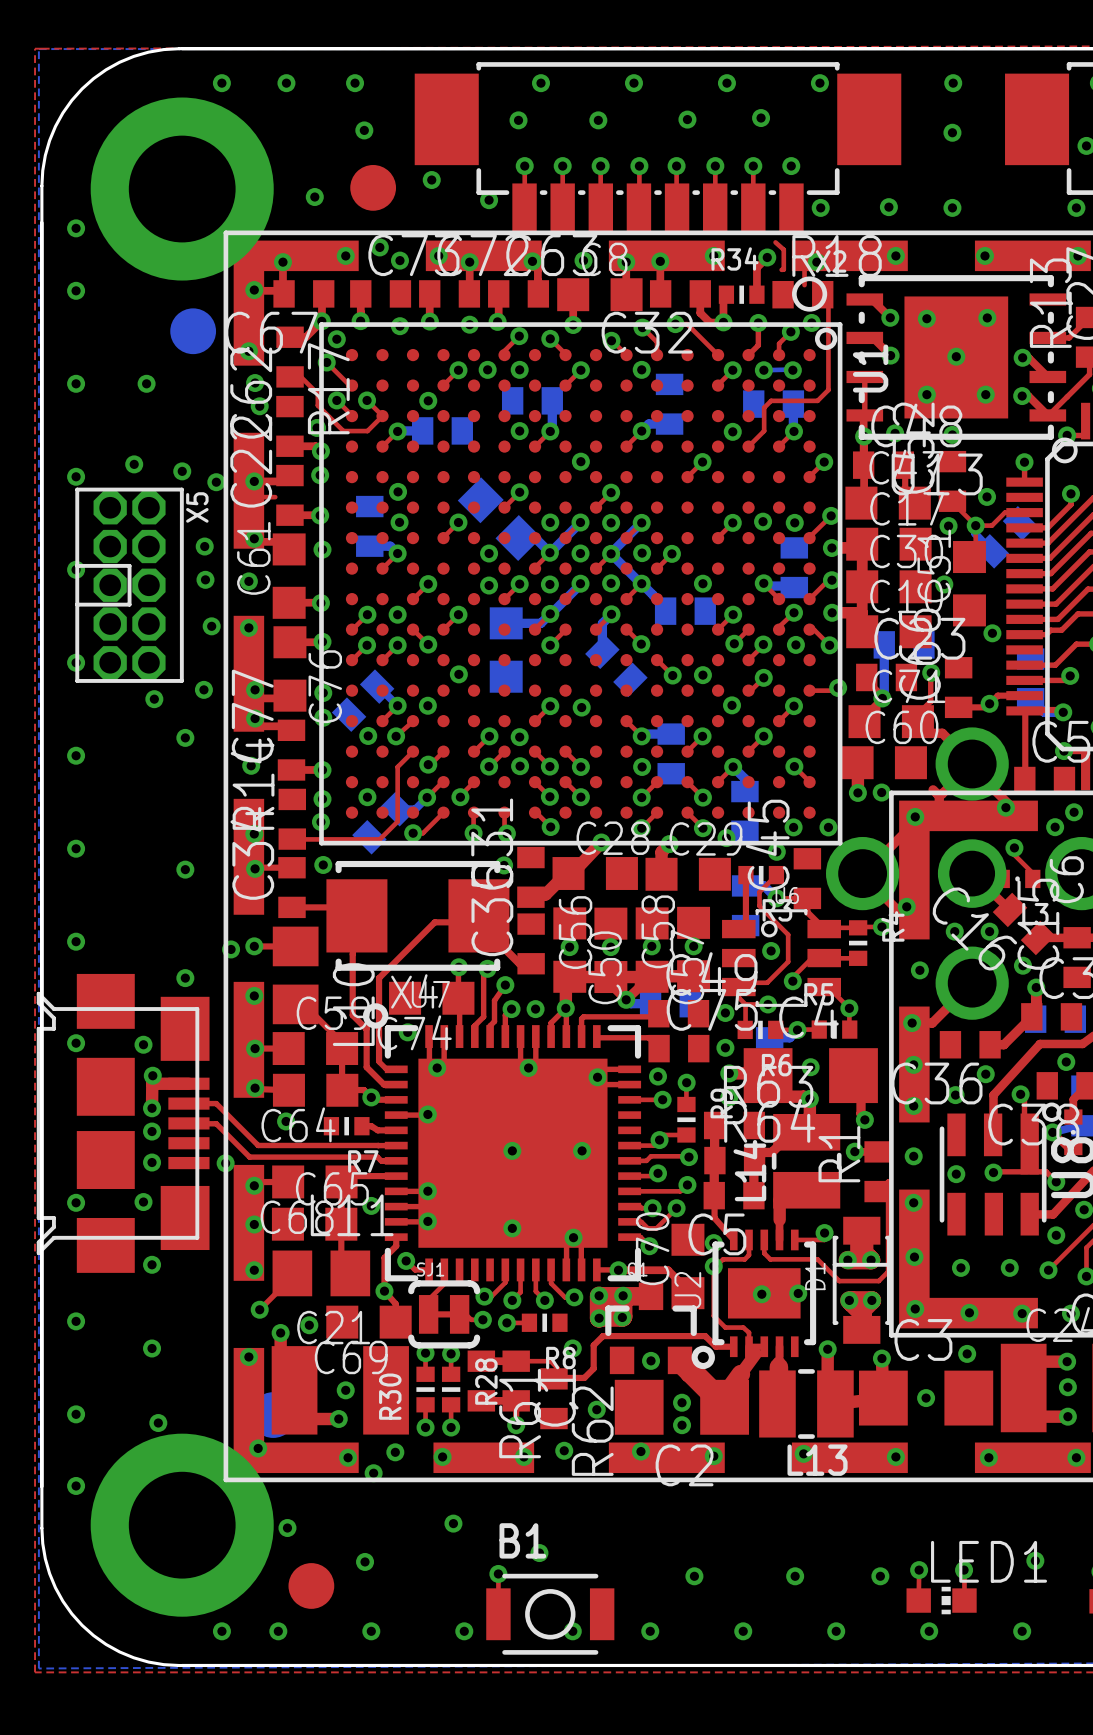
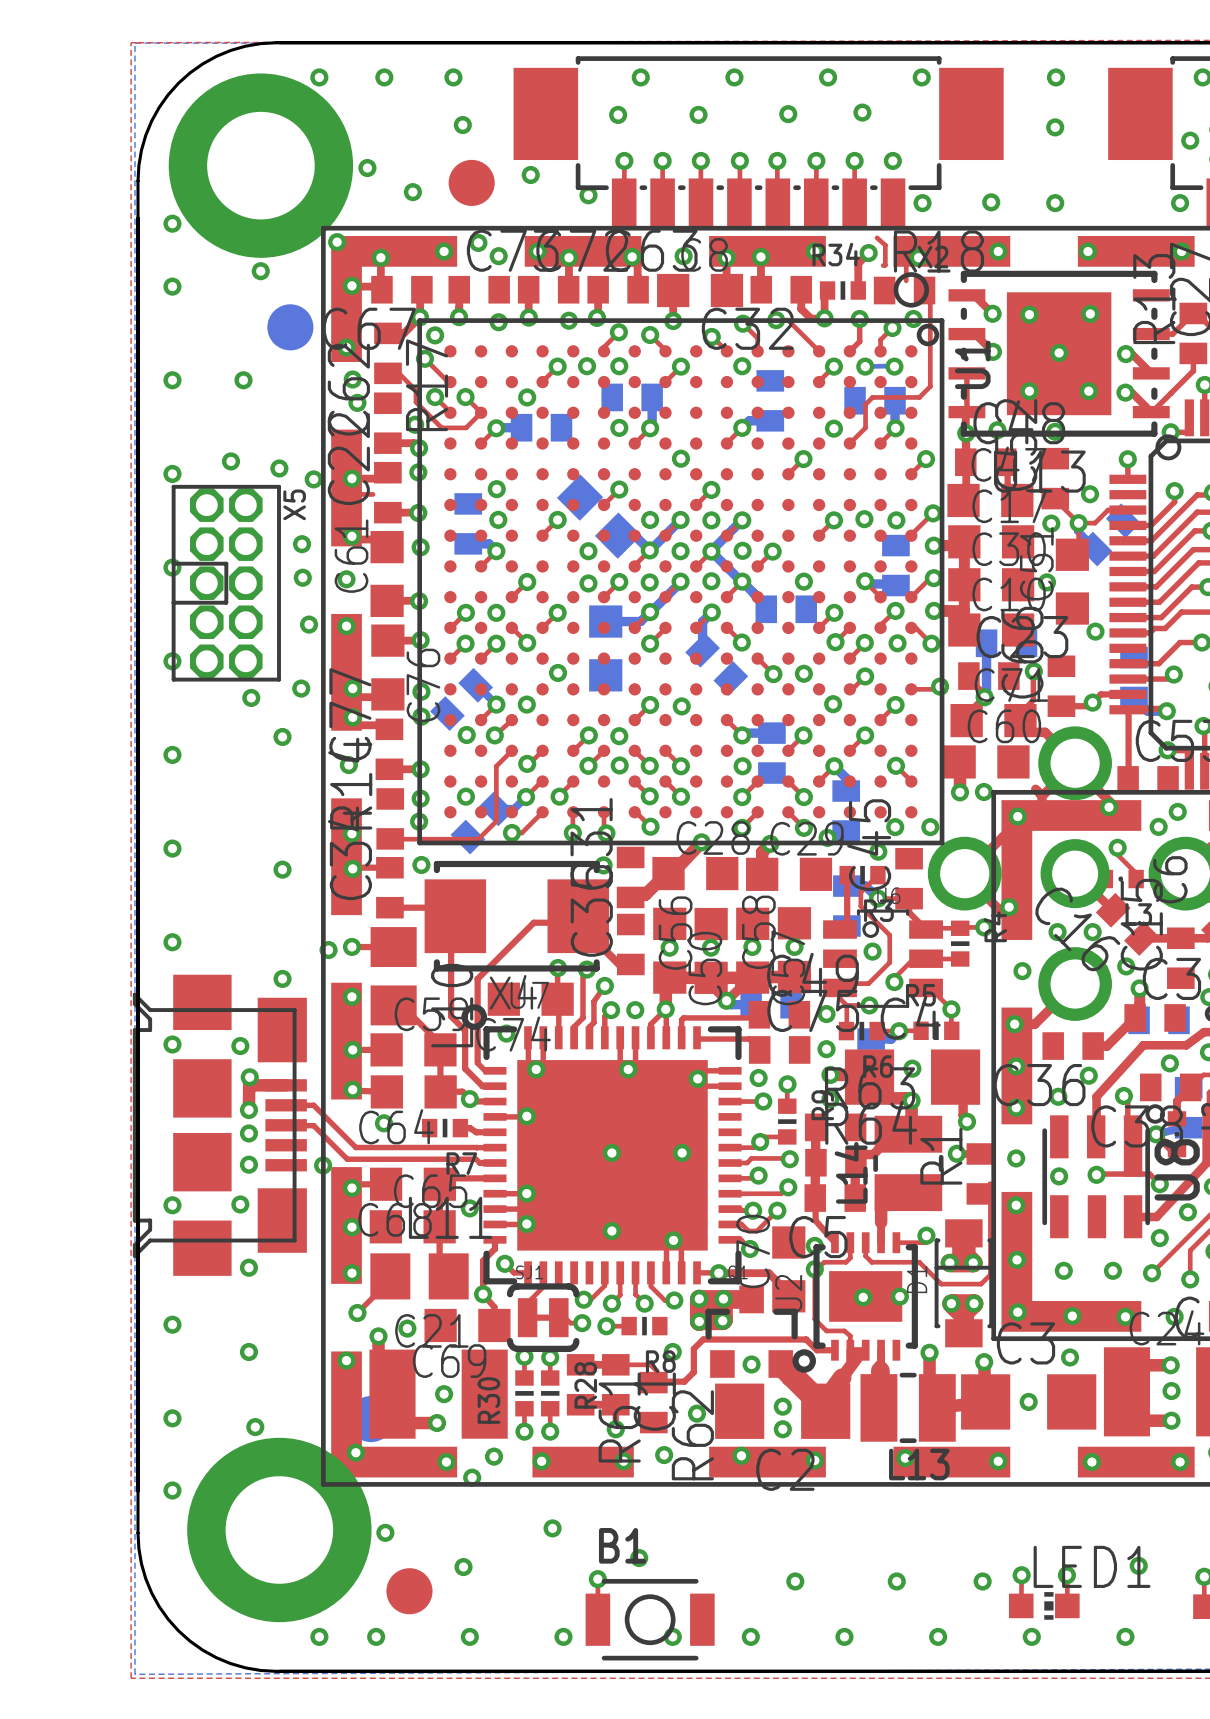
via: none -> (367, 168)
part position: (182, 189) -> (260, 165)
via: none -> (337, 242)
via: none -> (260, 271)

